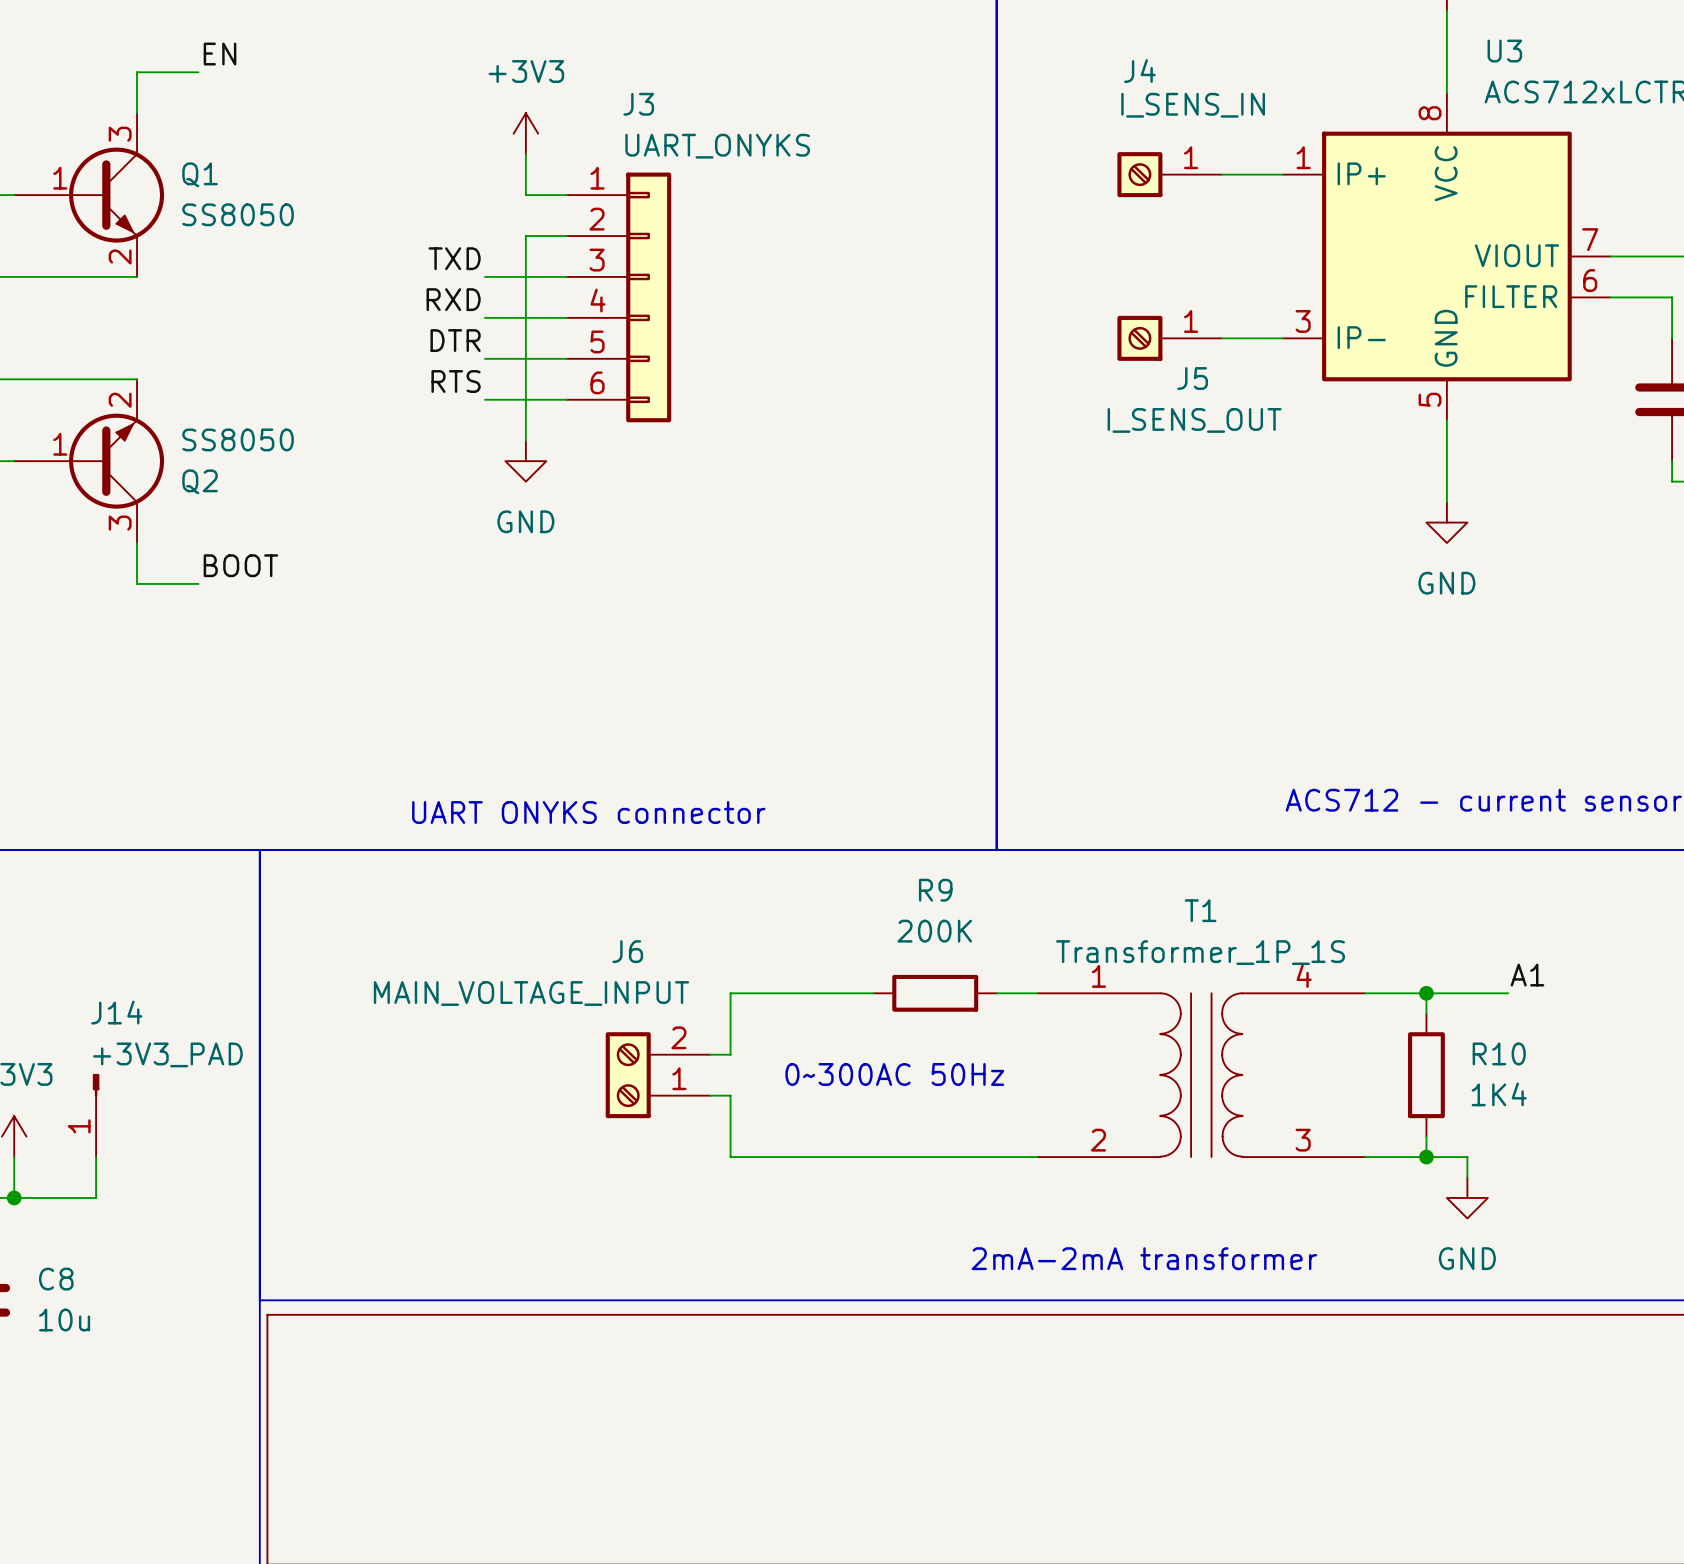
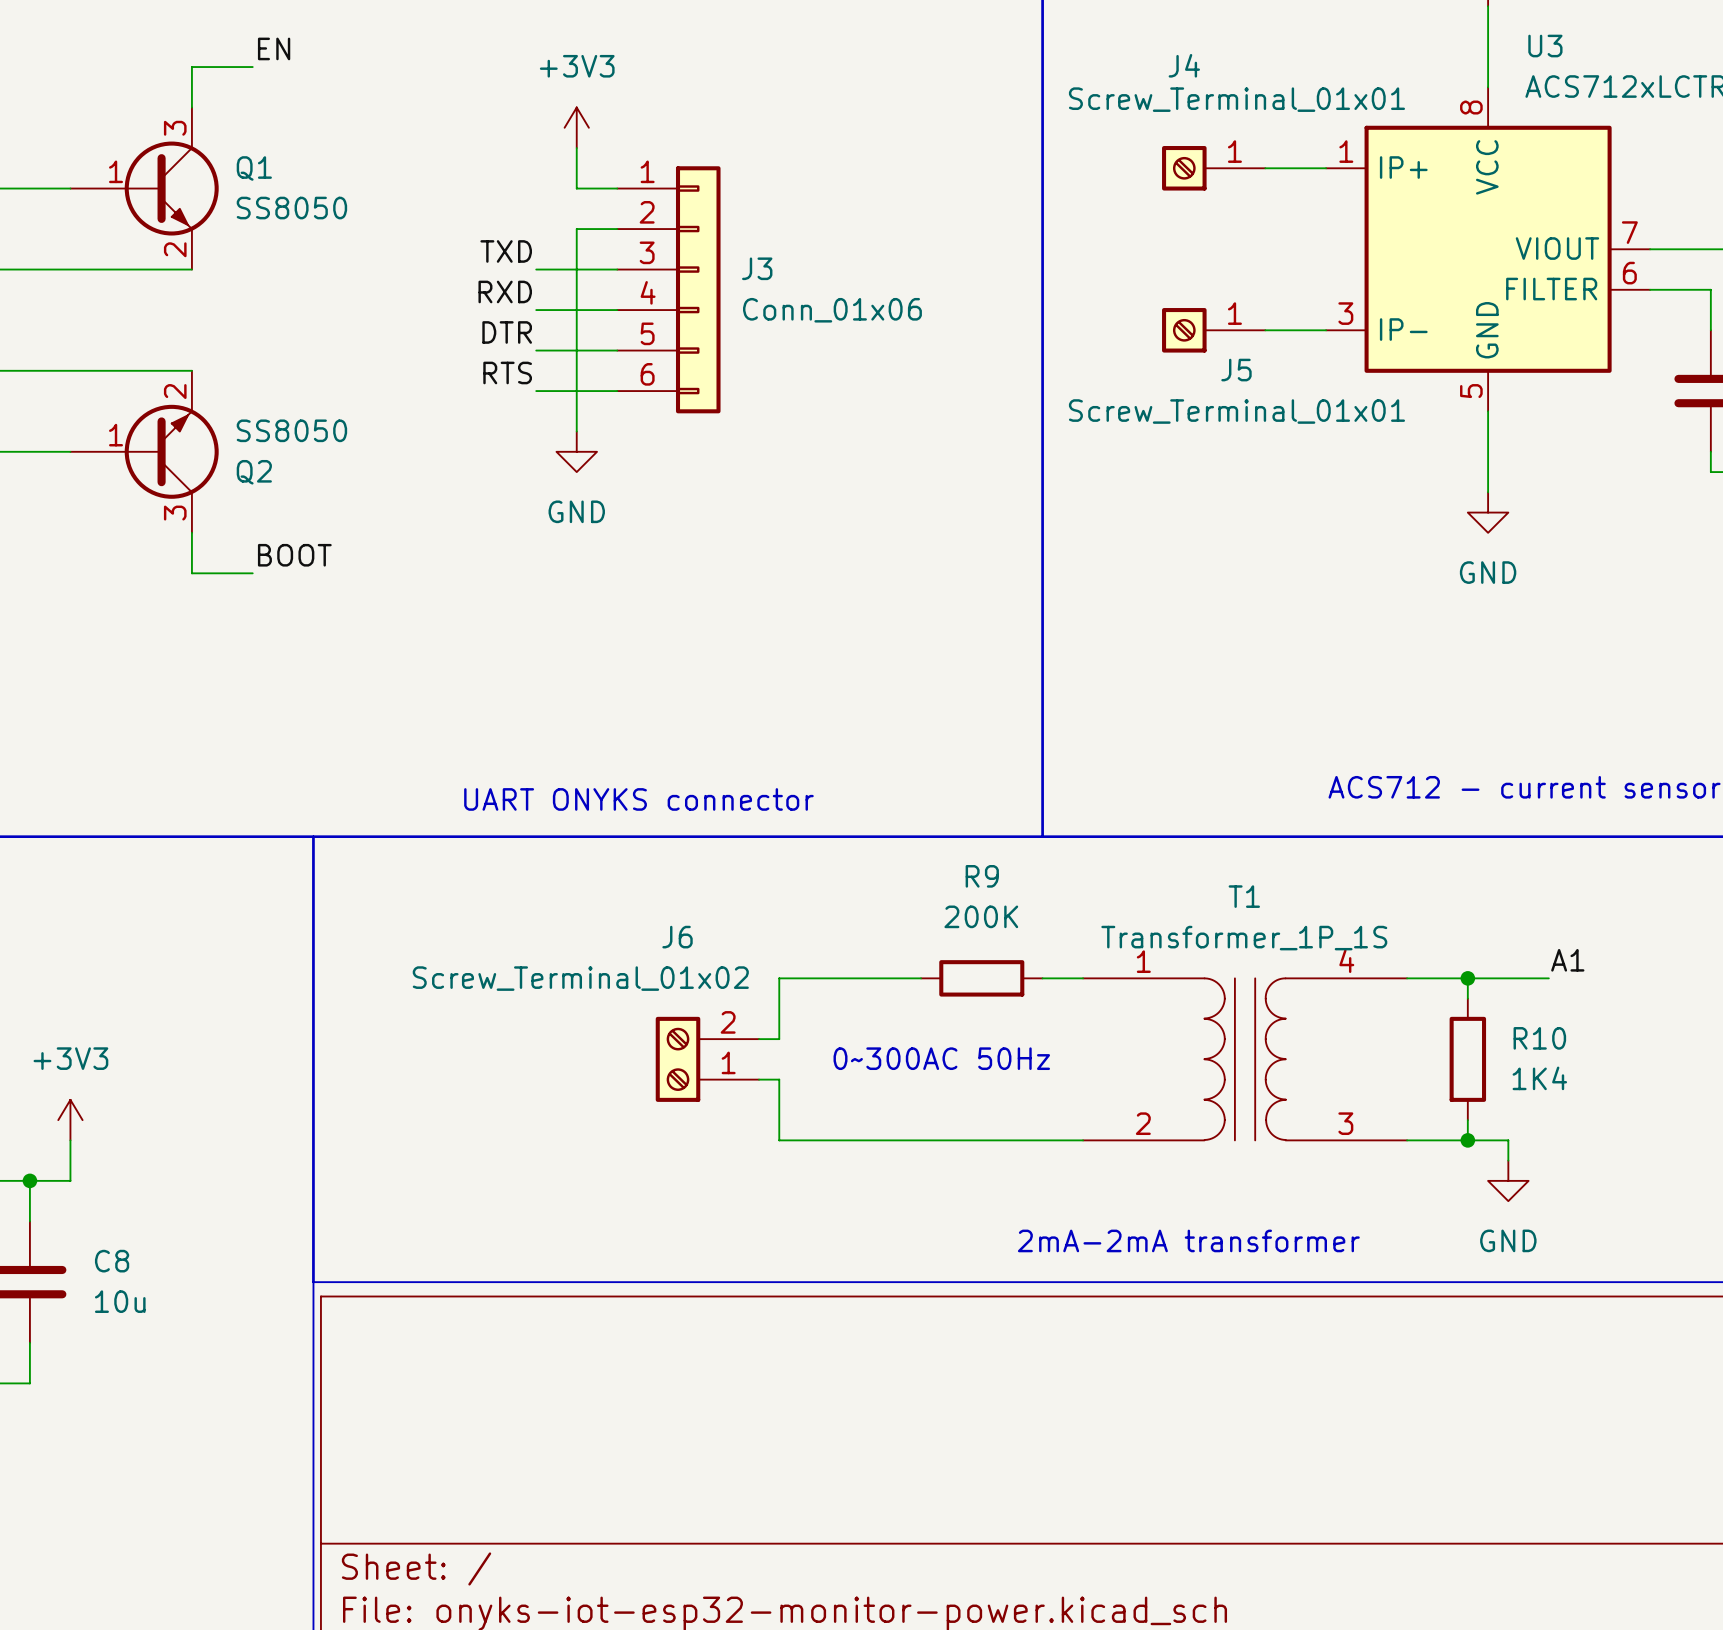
J3 name position: J3 (638, 104) -> J3 (757, 268)
J4 value: I_SENS_IN (1193, 105) -> Screw_Terminal_01x01 (1236, 99)
J3 value: UART_ONYKS (717, 146) -> Conn_01x06 (832, 310)
J5 value: I_SENS_OUT (1194, 420) -> Screw_Terminal_01x01 (1236, 411)
J6 value: MAIN_VOLTAGE_INPUT (531, 993) -> Screw_Terminal_01x02 (580, 978)
J14: +3V3_PAD (96, 1115) -> none
wire: (96, 1157) (96, 1197) (14, 1197) -> none
junction: (14, 1197) -> none

